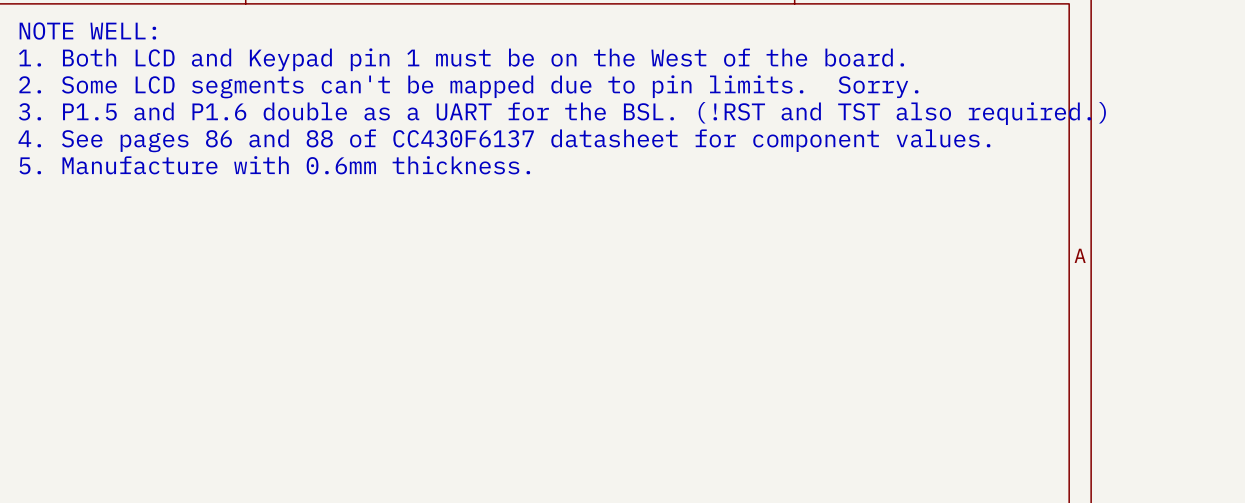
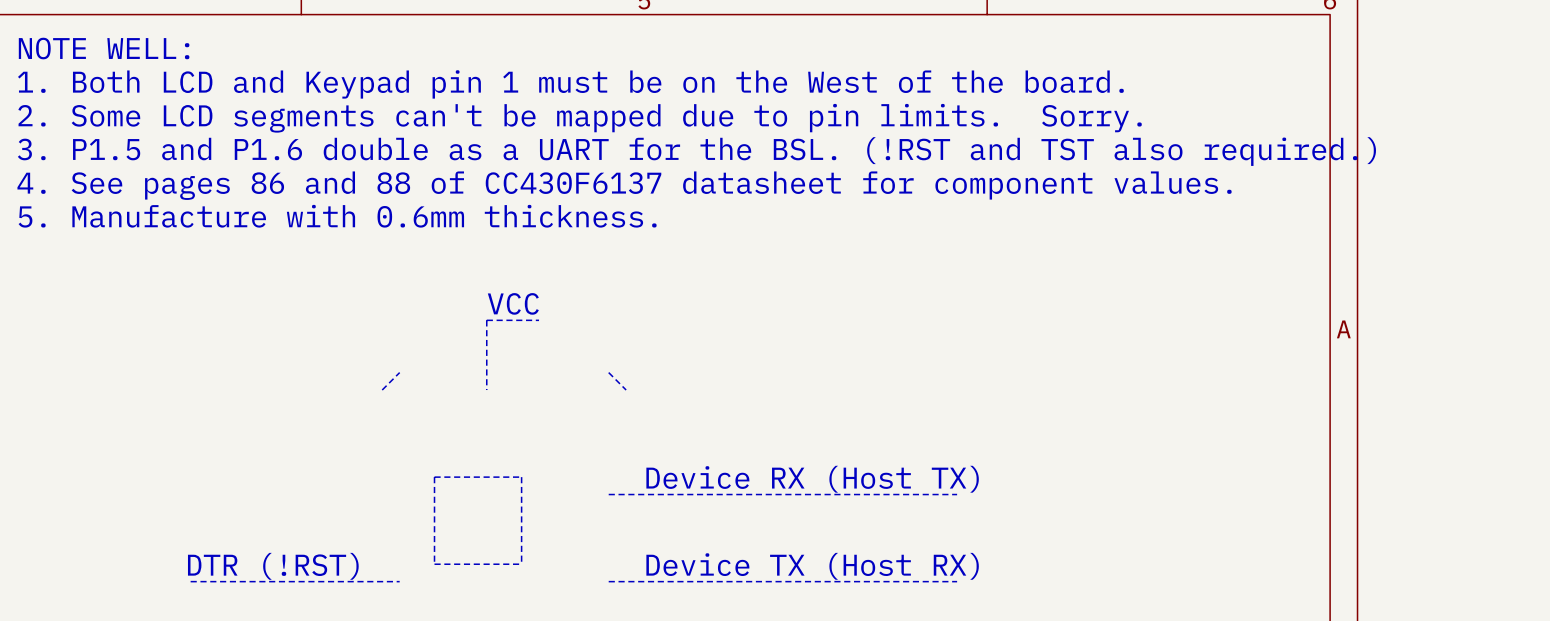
text: none -> VCC (513, 303)
line: none -> (539, 320) (486, 320) (486, 390)
line: none -> (399, 372) (382, 390)
line: none -> (608, 372) (626, 390)
line: none -> (434, 477) (434, 564) (521, 564) (521, 477) (434, 477)
text: none -> Device RX (Host TX) (812, 479)
line: none -> (608, 494) (957, 494)
text: none -> DTR (!RST) (273, 566)
text: none -> Device TX (Host RX) (812, 566)
line: none -> (190, 581) (399, 581)
line: none -> (608, 581) (957, 581)

